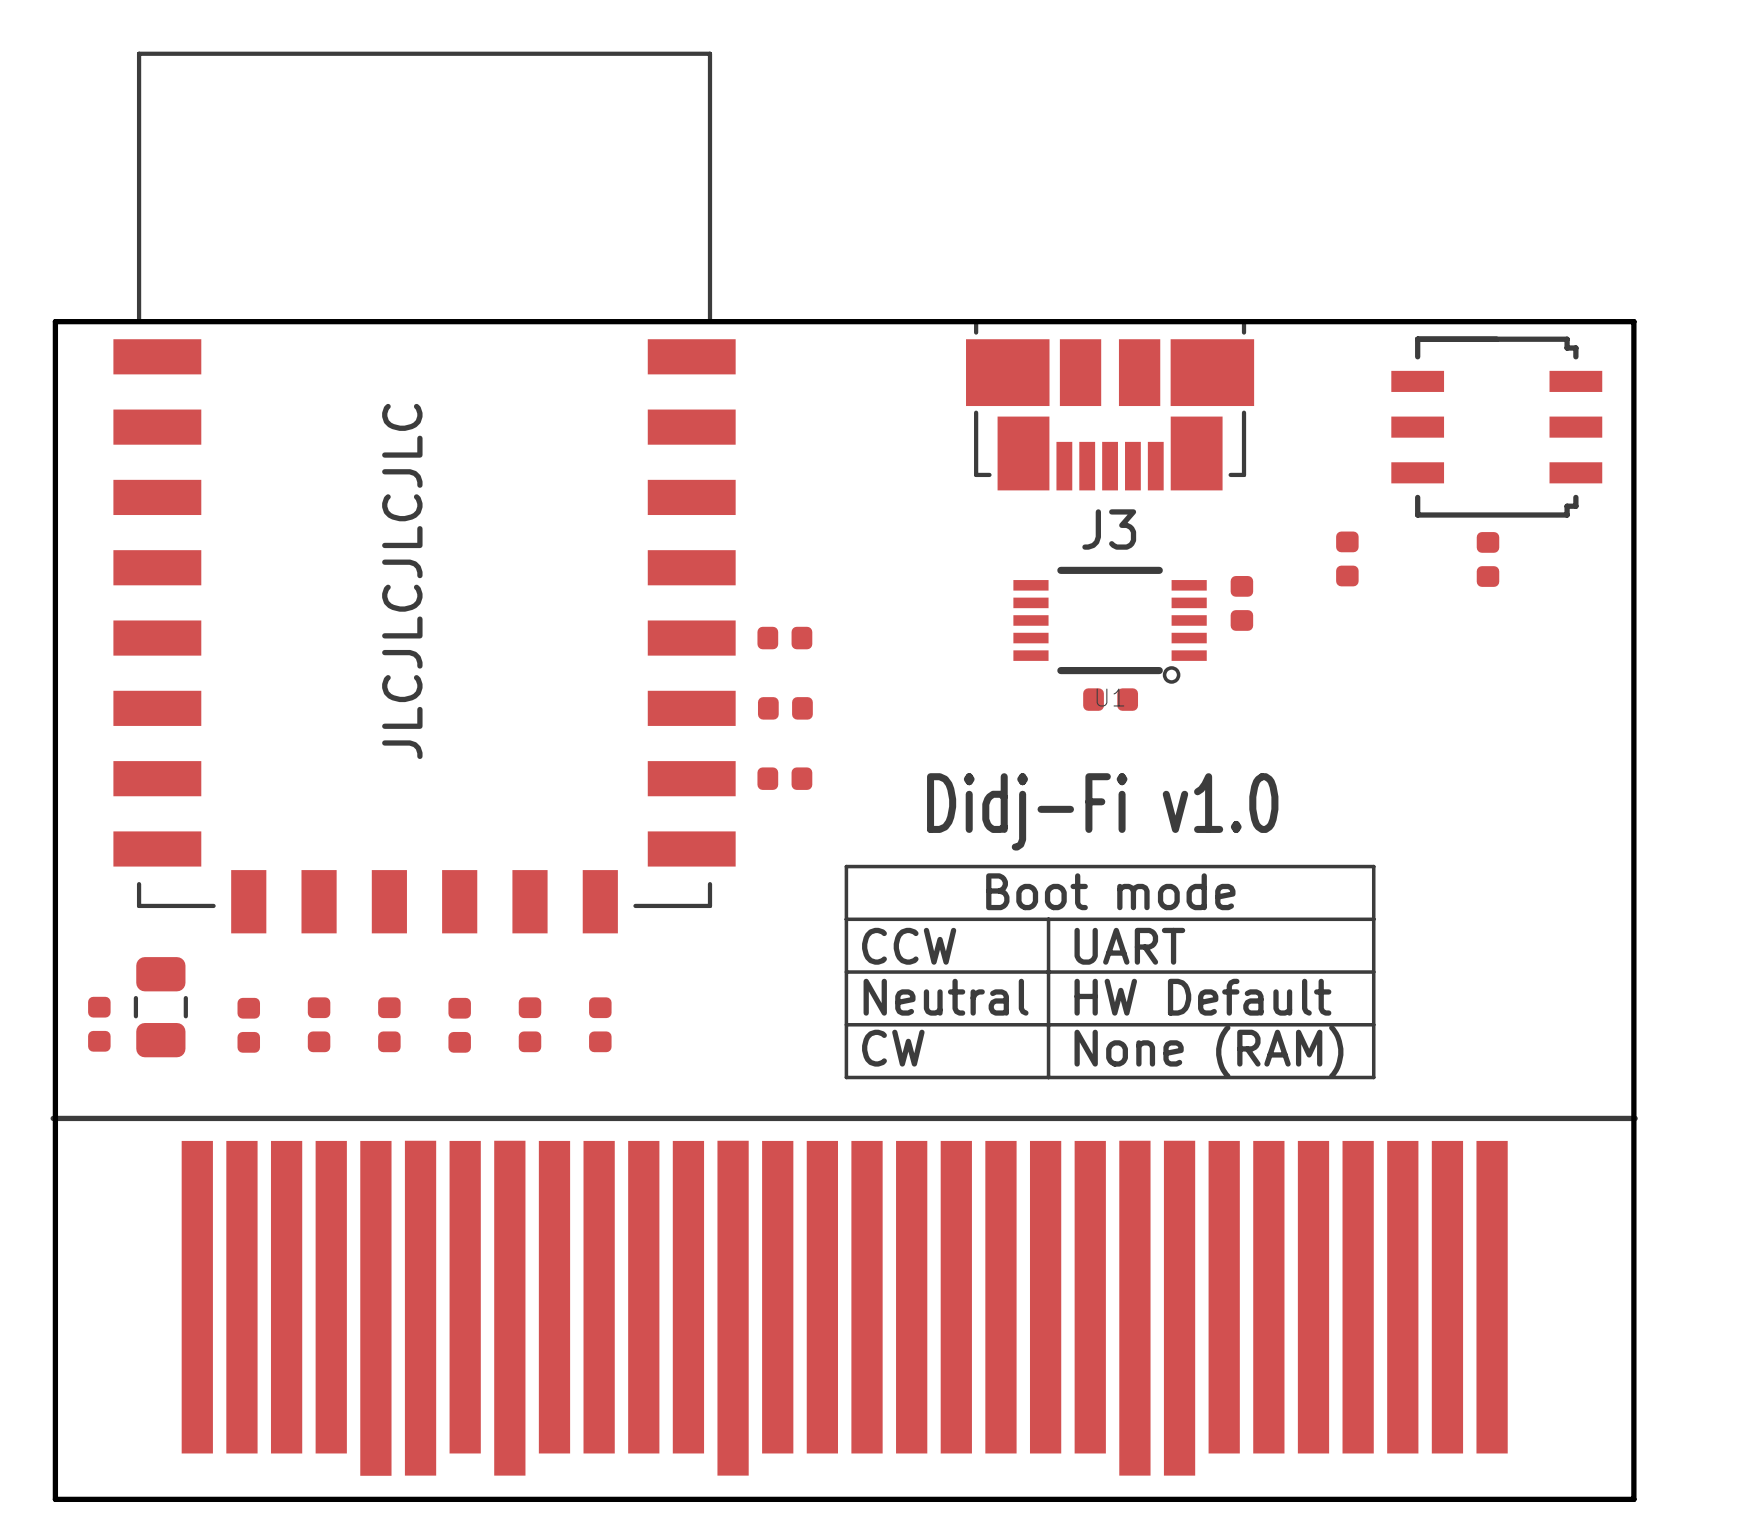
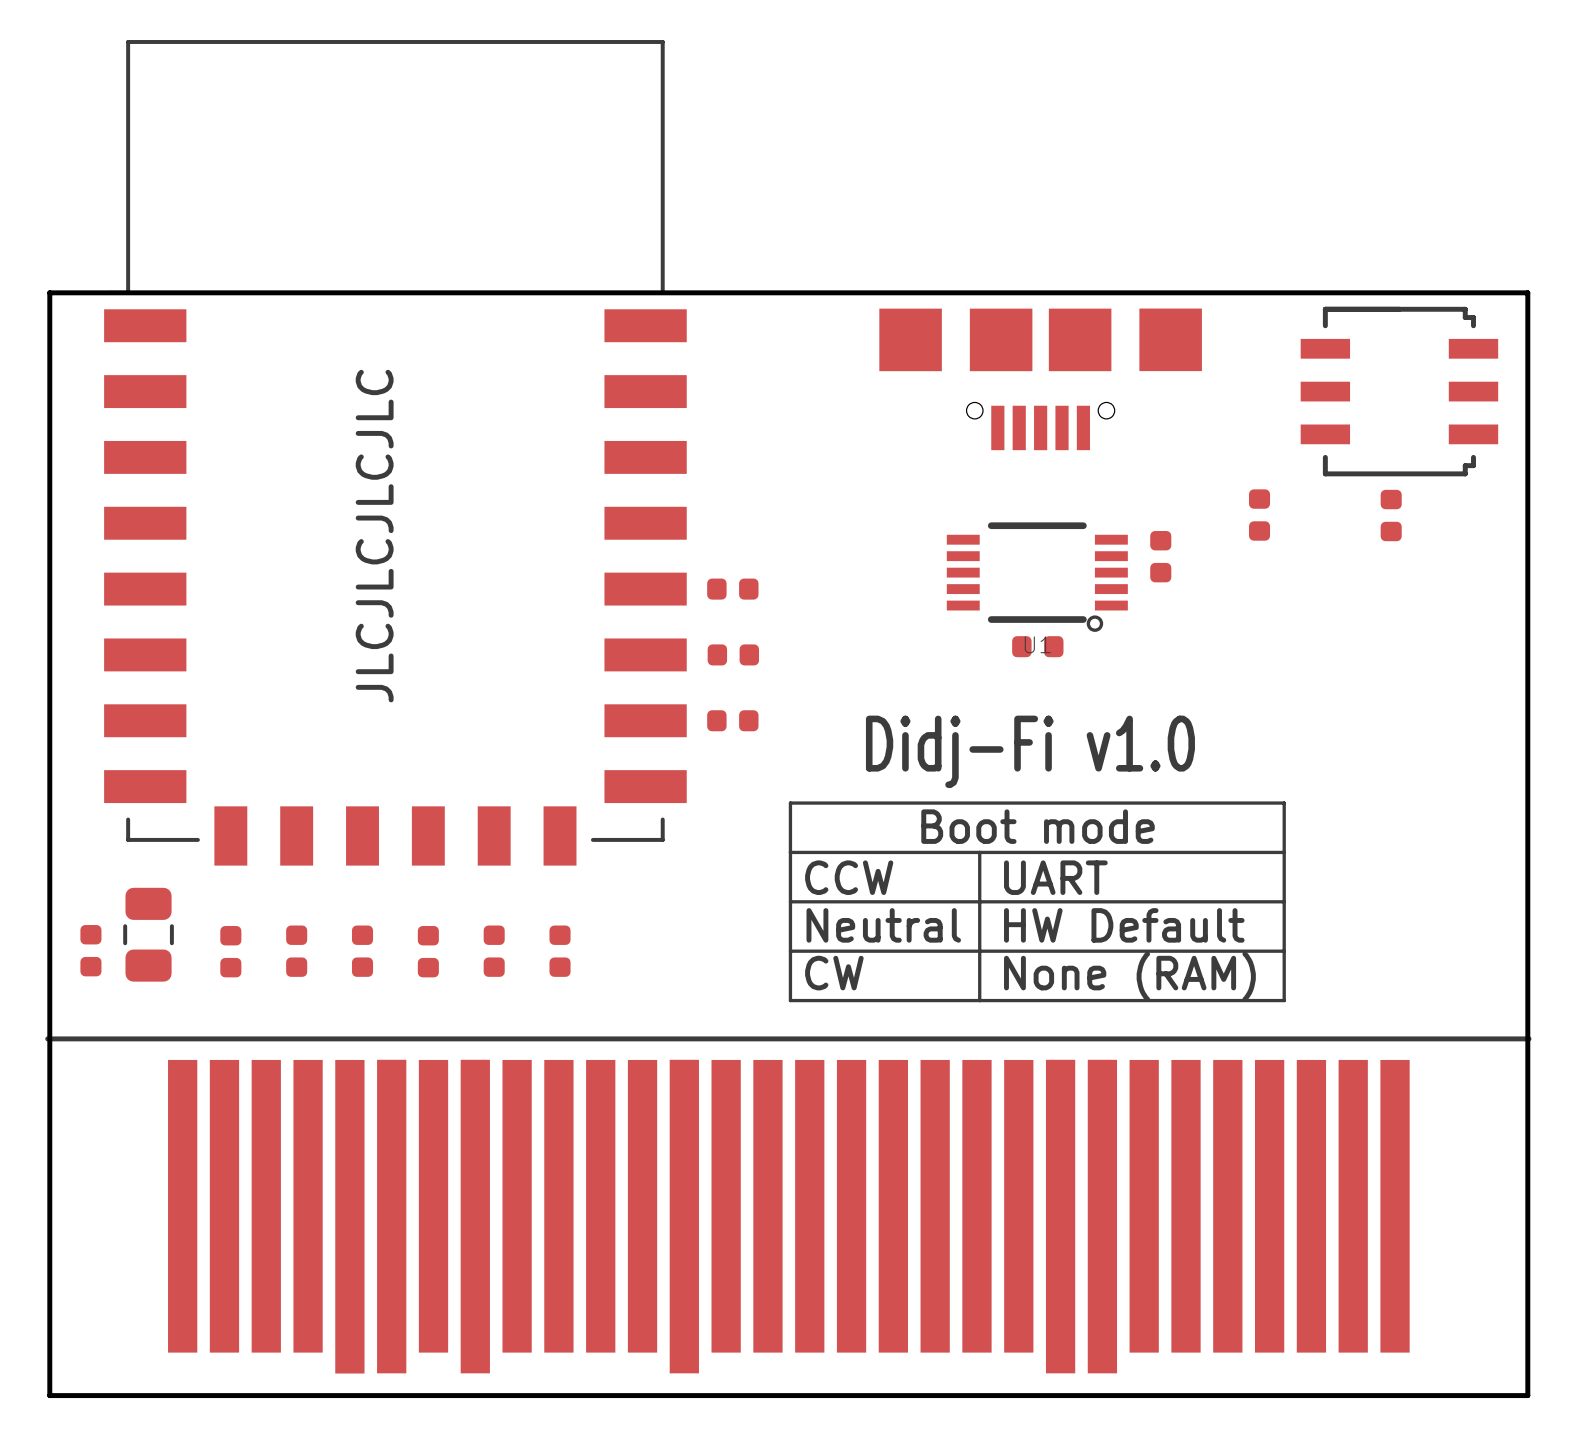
J3: (1110, 405) -> none
part: none -> (1040, 379)

